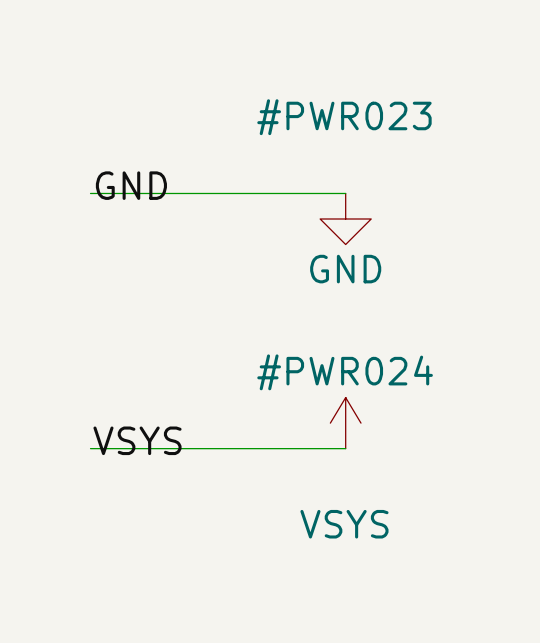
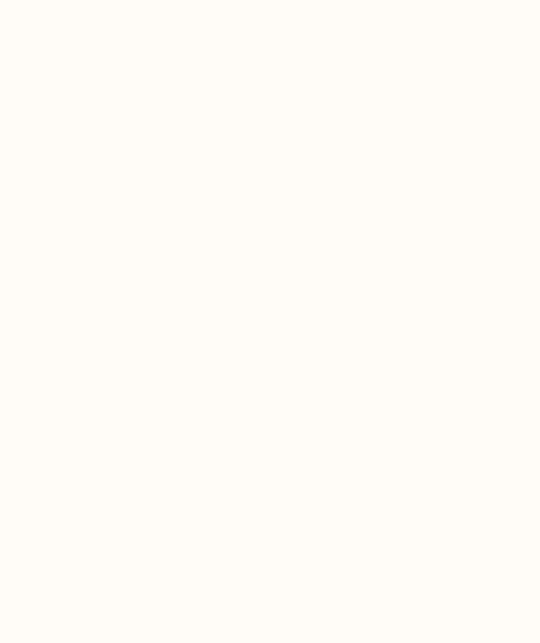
label: GND (131, 185) -> none
wire: (90, 193) (345, 193) -> none
#PWR023: GND (345, 219) -> none
#PWR024: VSYS (345, 423) -> none
label: VSYS (137, 440) -> none
wire: (90, 448) (345, 448) -> none

